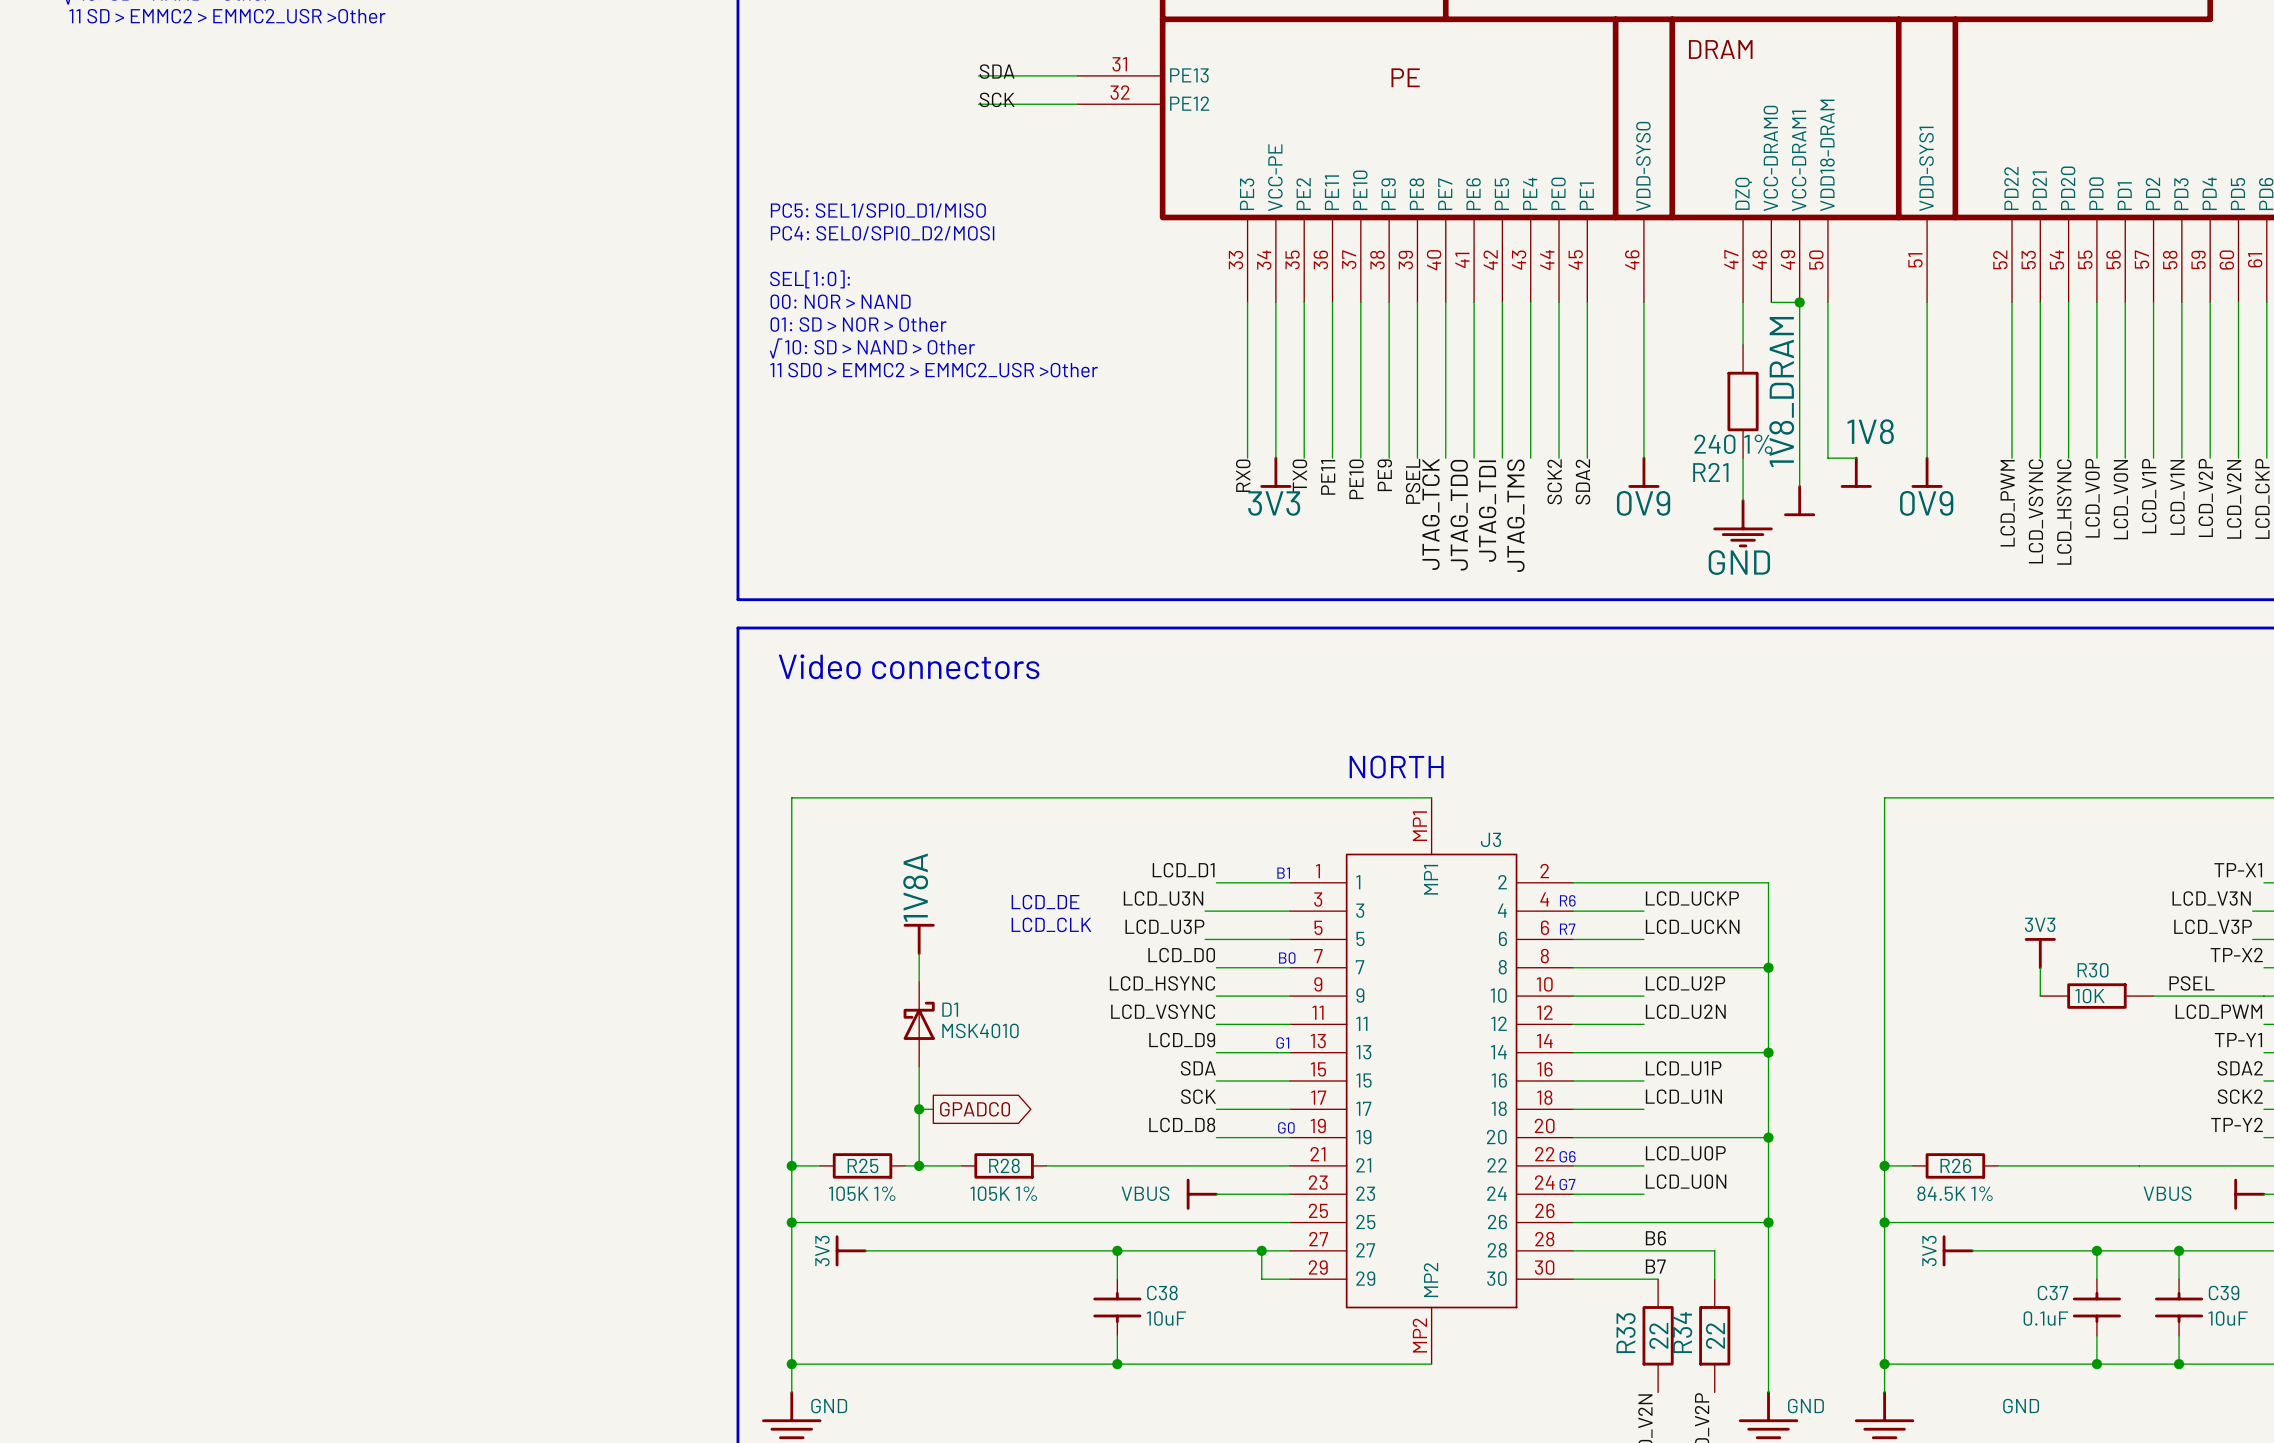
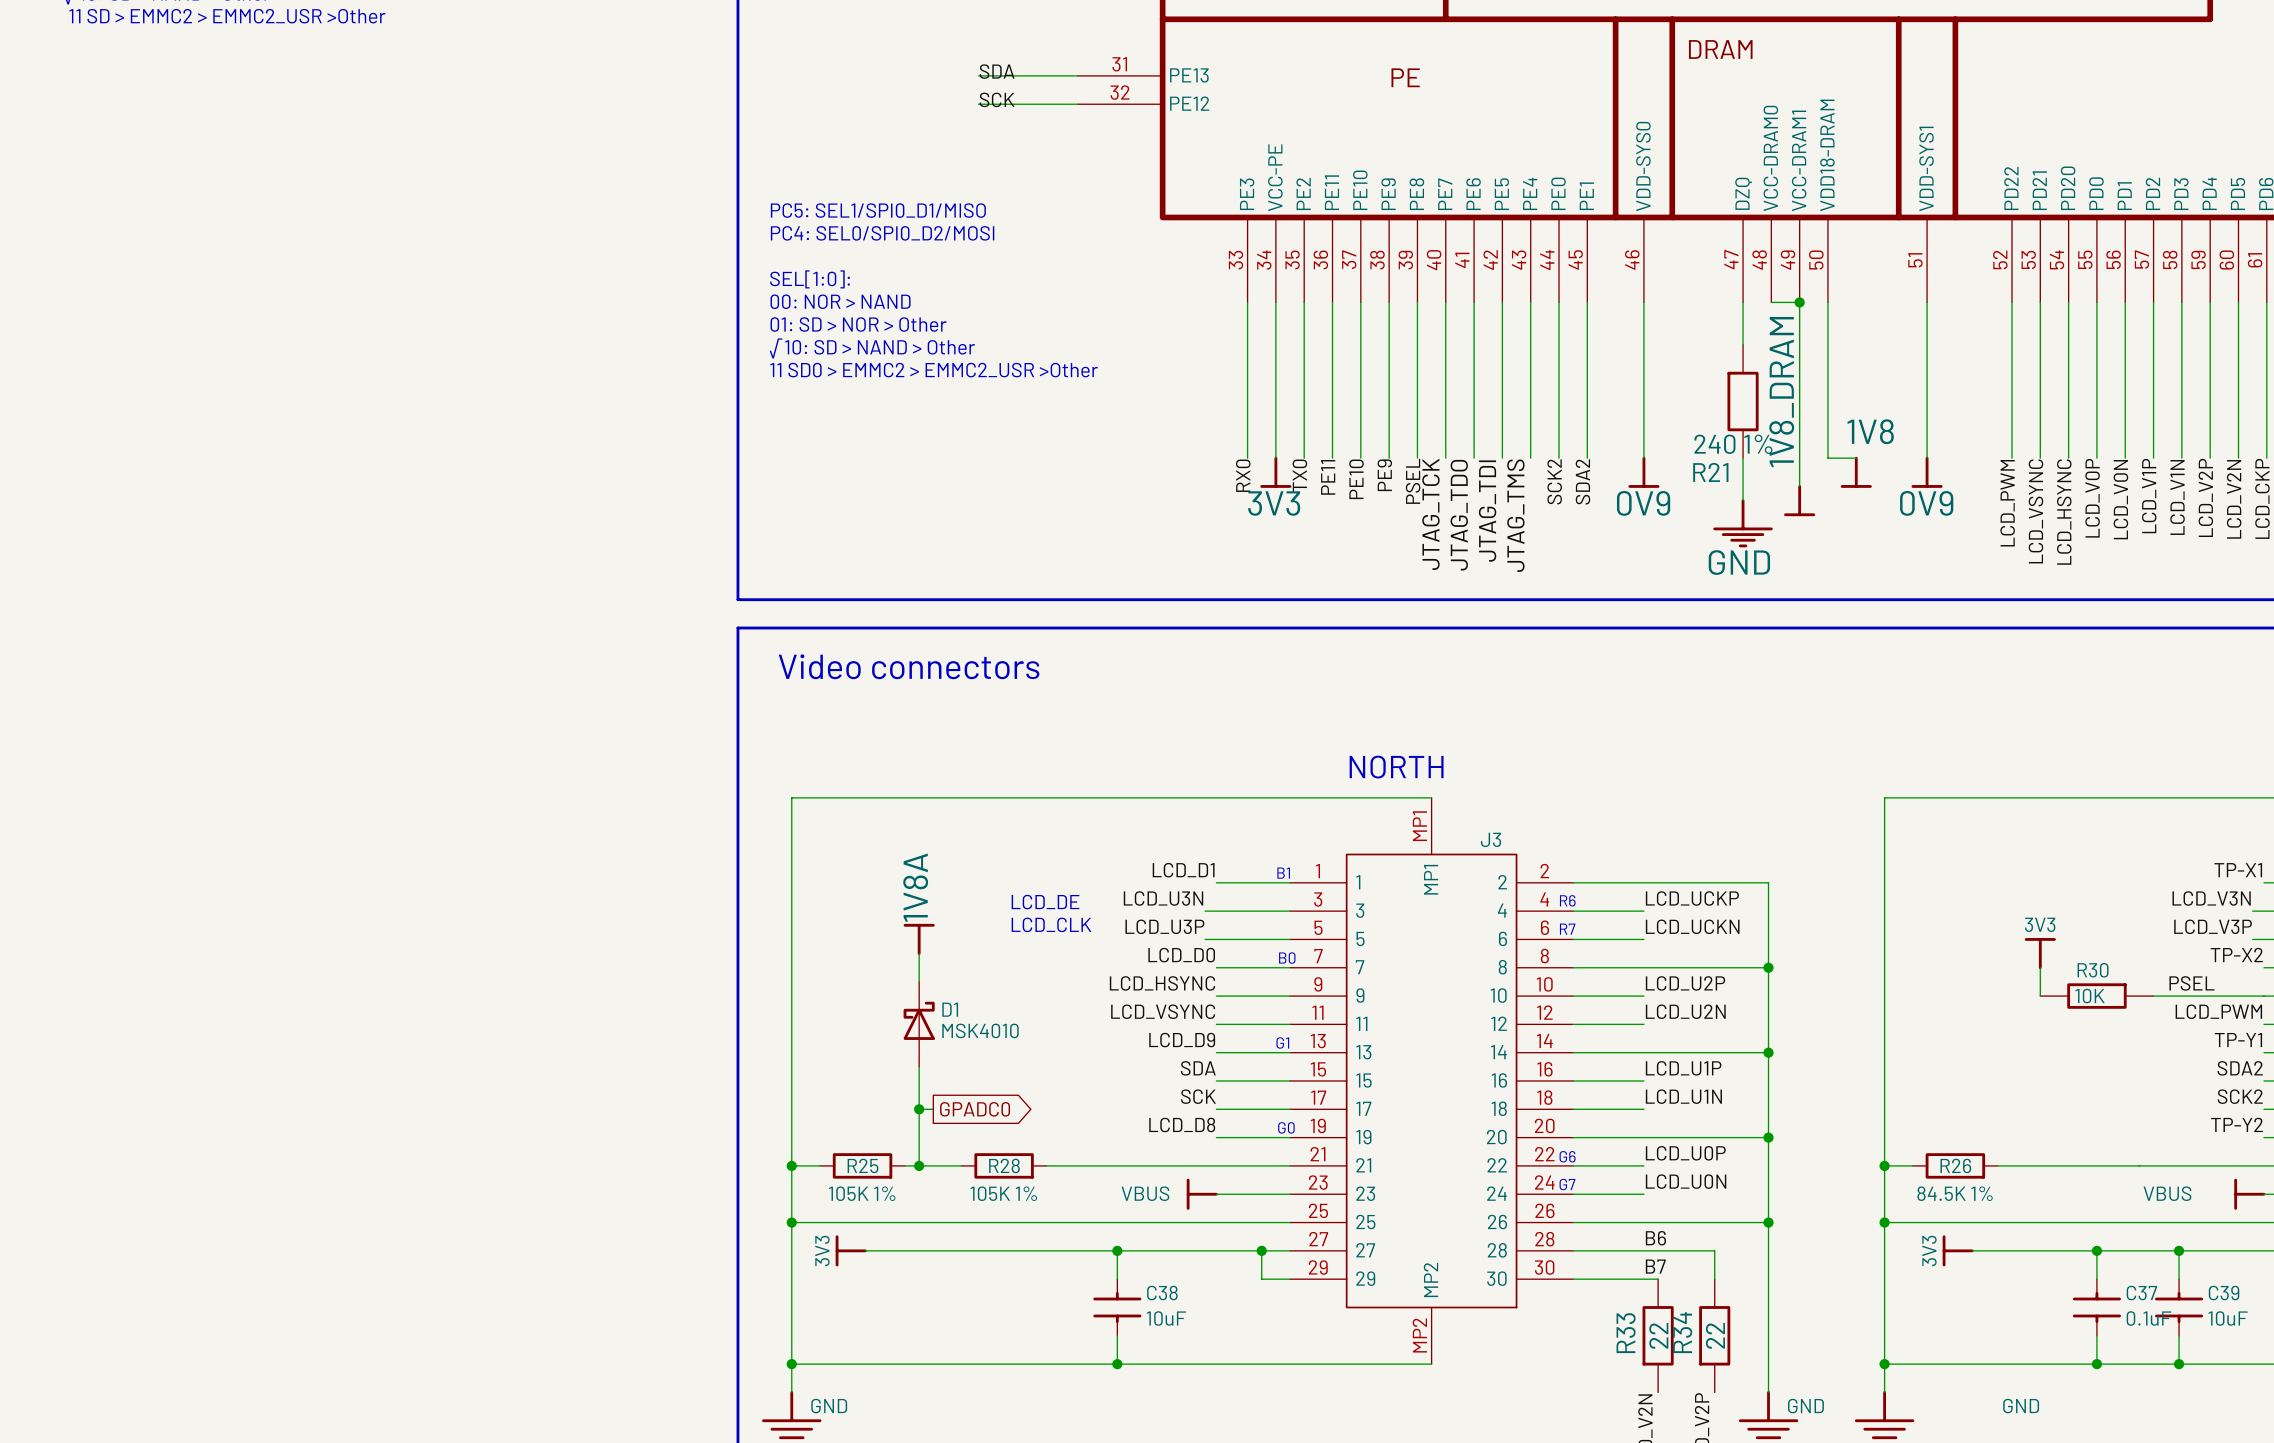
C37 name position: C37 (2053, 1293) -> C37 (2141, 1293)
C37 value position: 0.1uF (2045, 1318) -> 0.1uF (2148, 1318)

